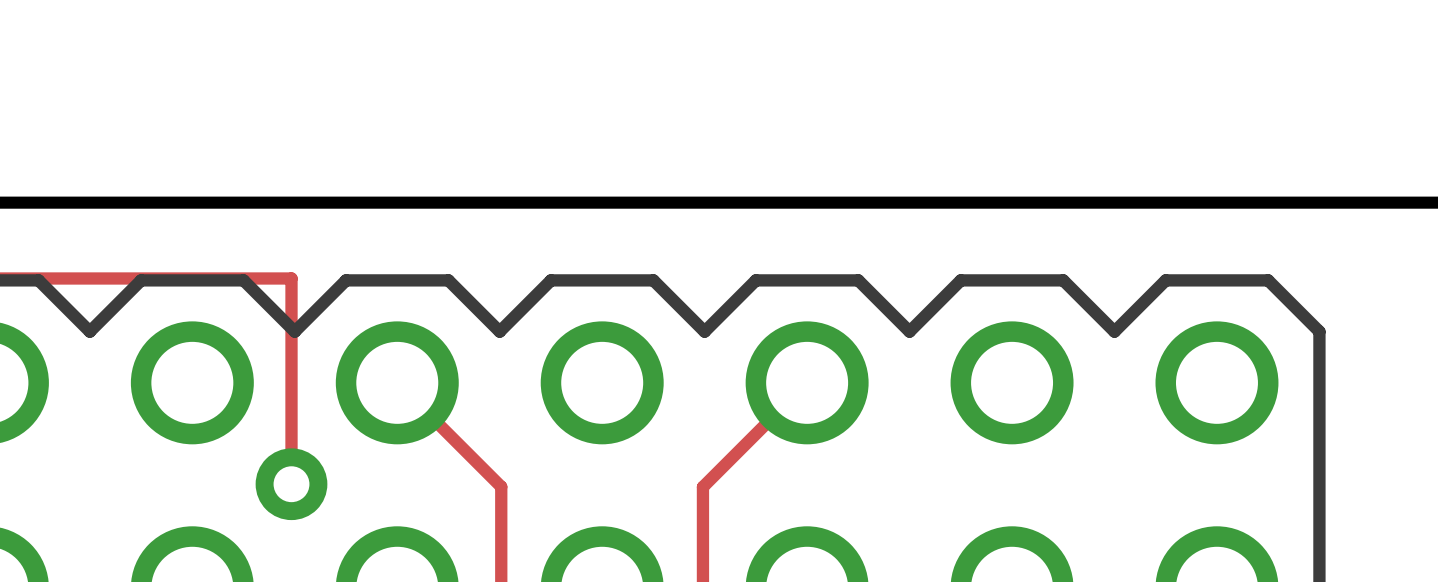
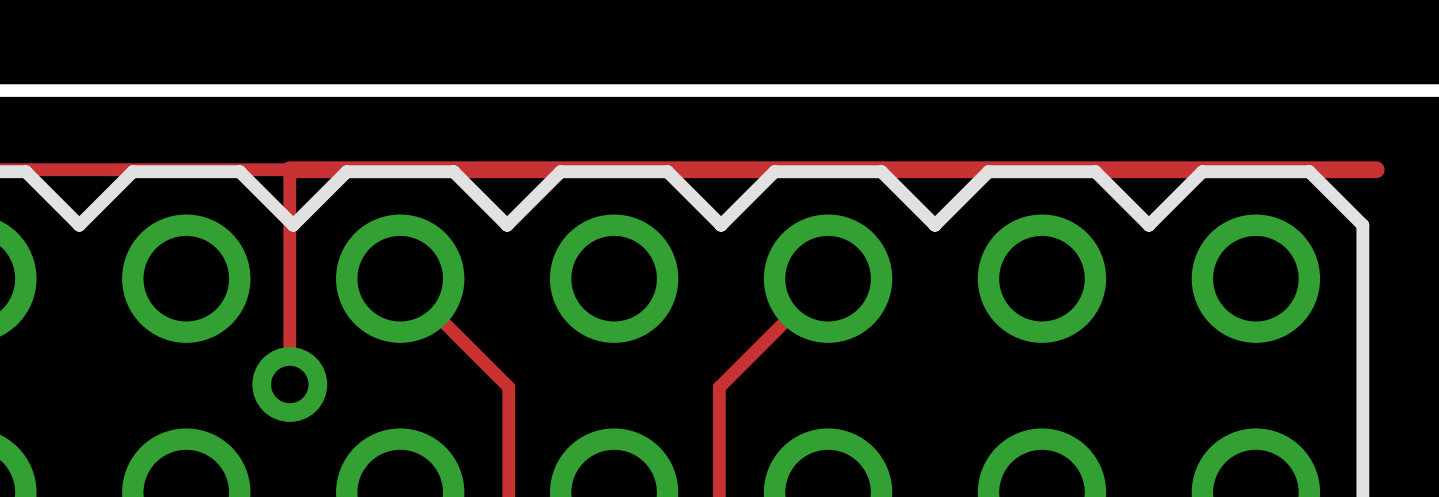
track: none -> (289, 169) (1376, 169)

